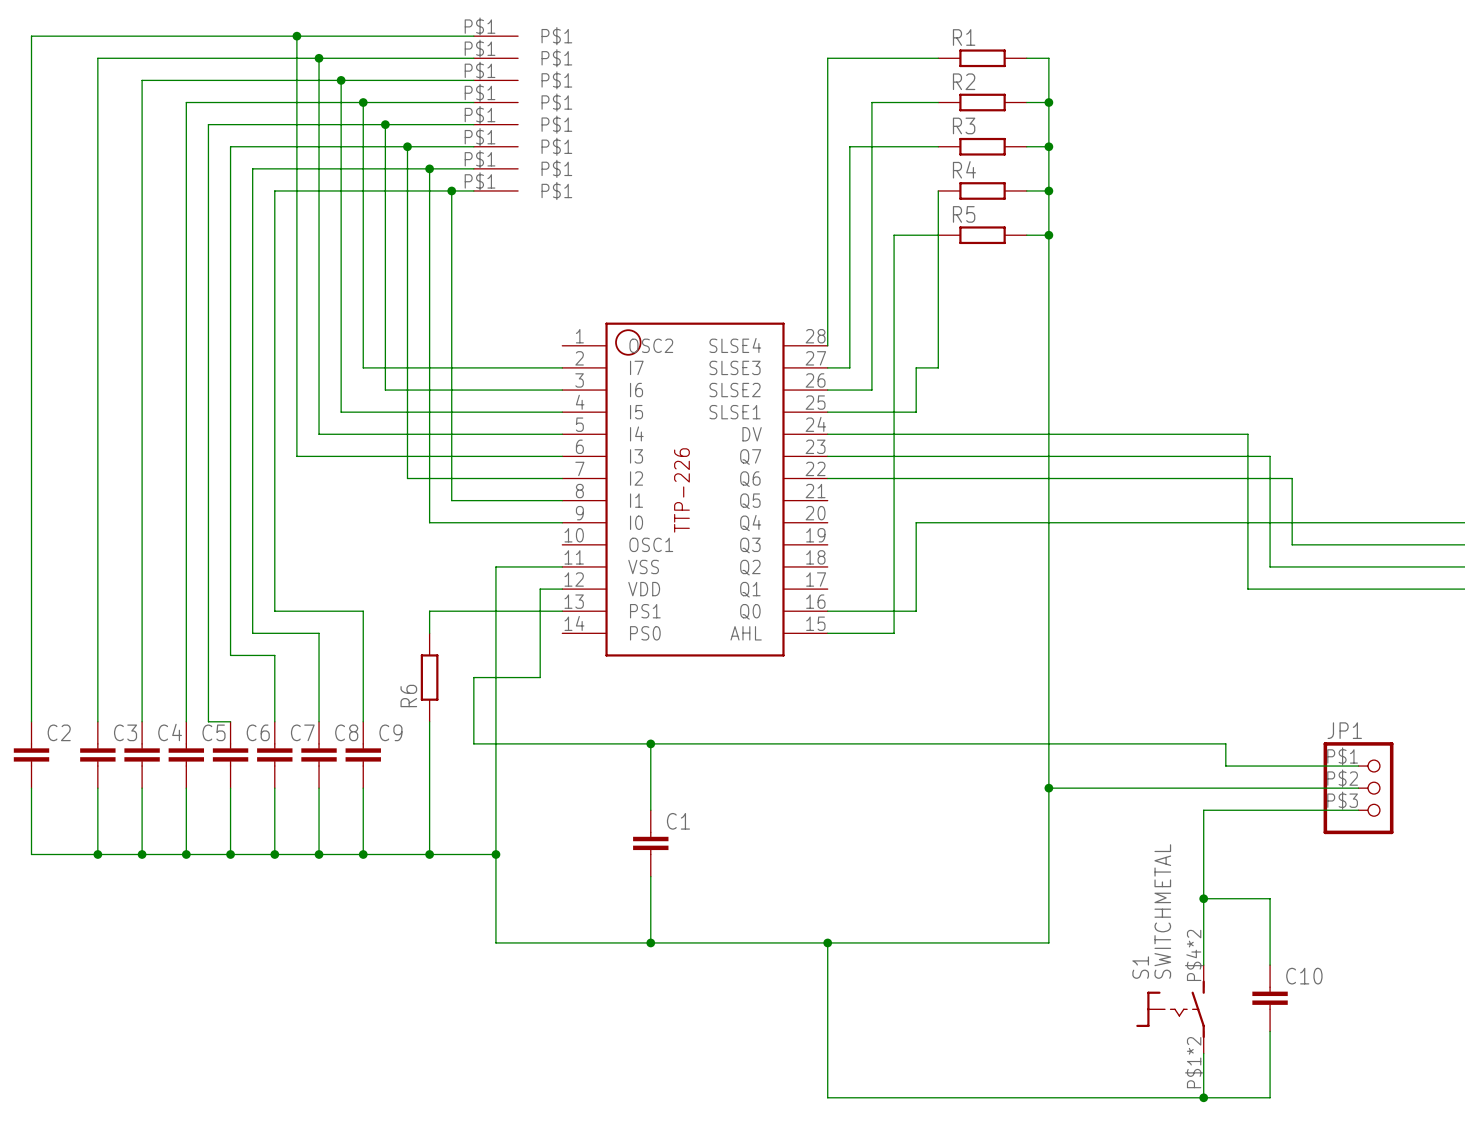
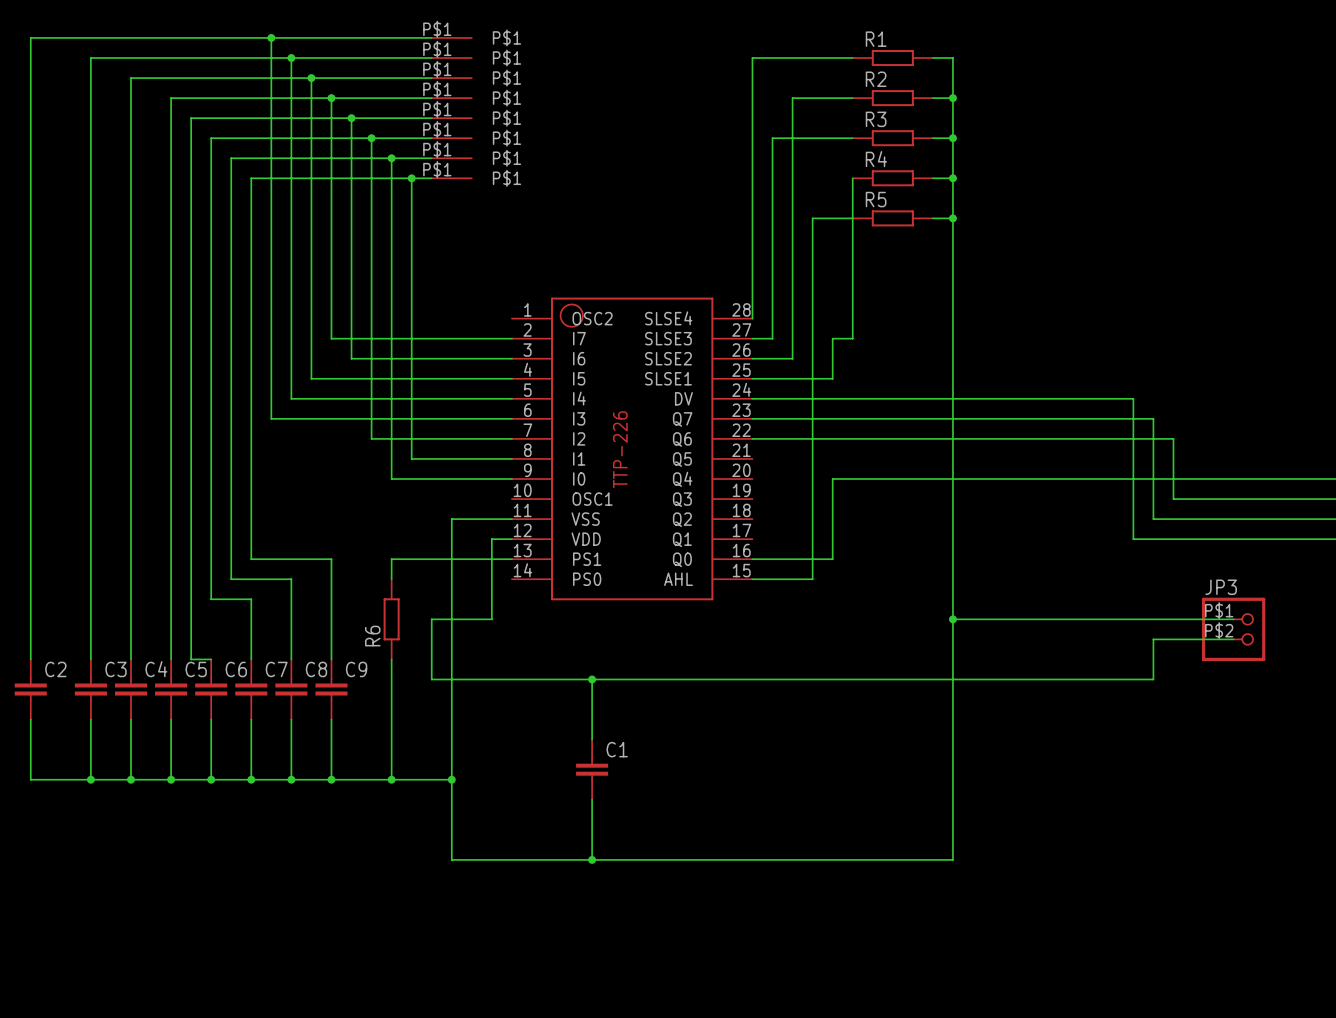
junction: none -> (952, 619)
JP3: none -> (1233, 629)
wire: (1225, 743) (1225, 766) (1358, 766) -> (1113, 679) (1153, 679) (1153, 639) (1233, 639)
wire: (1048, 788) (1358, 788) -> (952, 619) (1233, 619)
junction: (1048, 788) -> none
JP1: (1358, 788) -> none
wire: (1358, 810) (1203, 810) (1203, 965) -> none
wire: (1203, 898) (1270, 898) (1270, 965) -> none
junction: (1203, 898) -> none
wire: (827, 942) (827, 1097) (1270, 1097) (1270, 1031) -> none
junction: (827, 942) -> none
C10: (1270, 998) -> none
S1: SWITCHMETAL (1170, 1009) -> none
wire: (1203, 1053) (1203, 1097) -> none
junction: (1203, 1097) -> none

